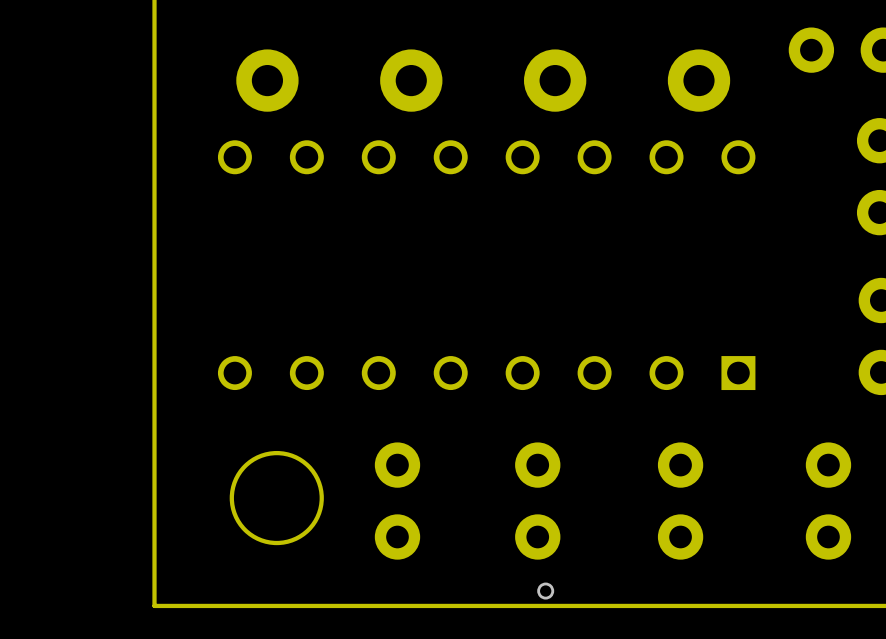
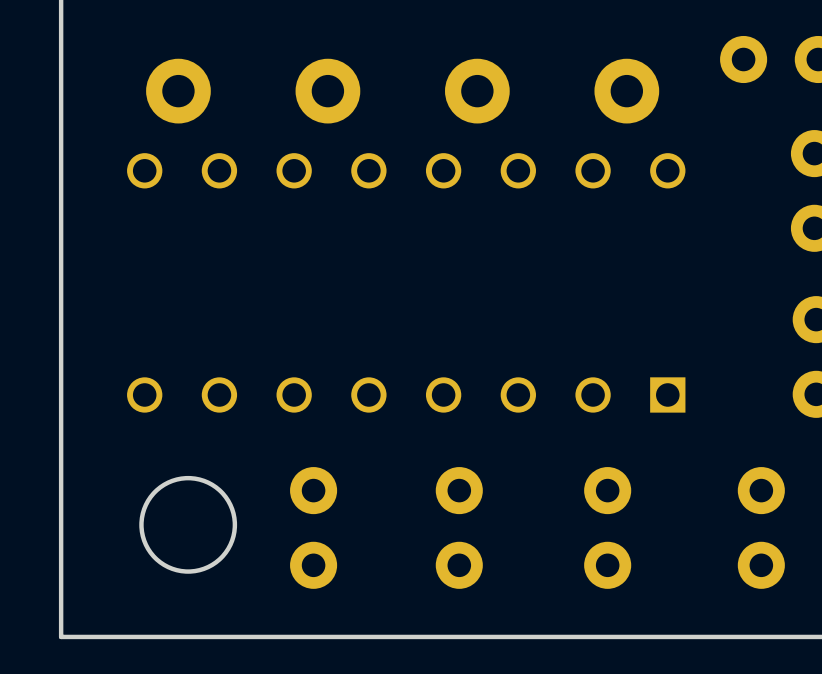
via: (545, 591) -> none

